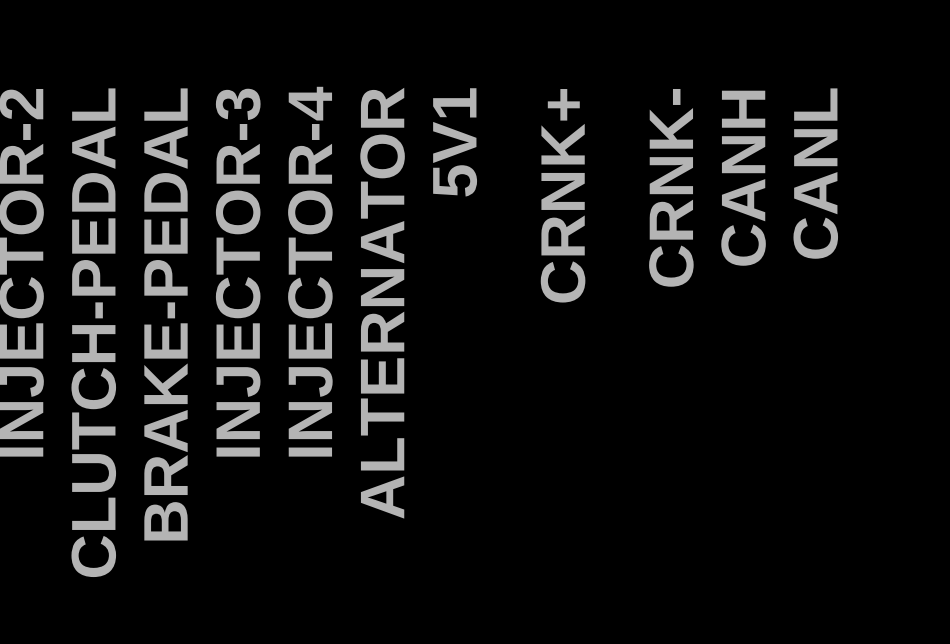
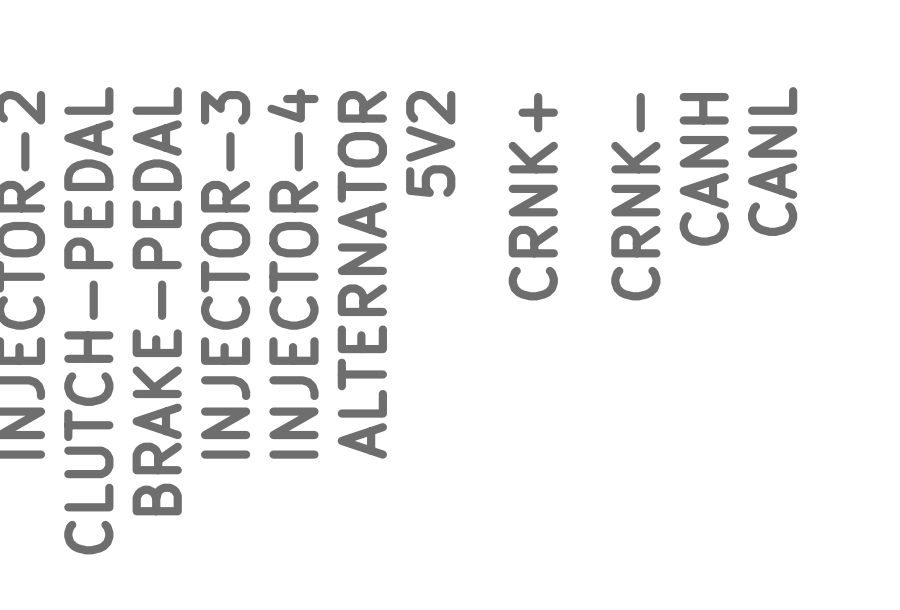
label: 5V1 (455, 142) -> 5V2 (430, 143)

